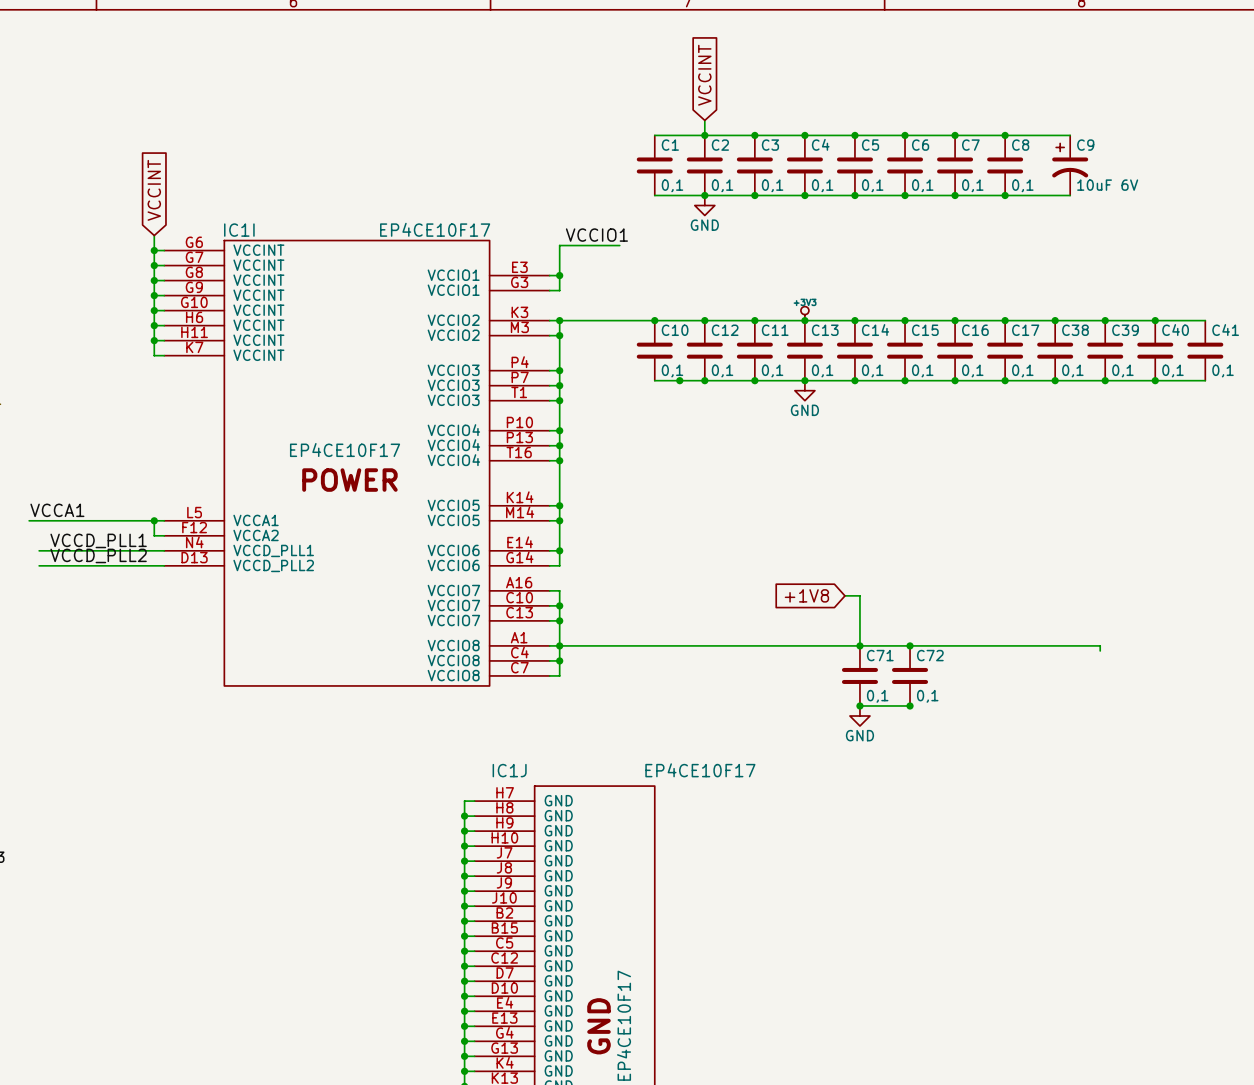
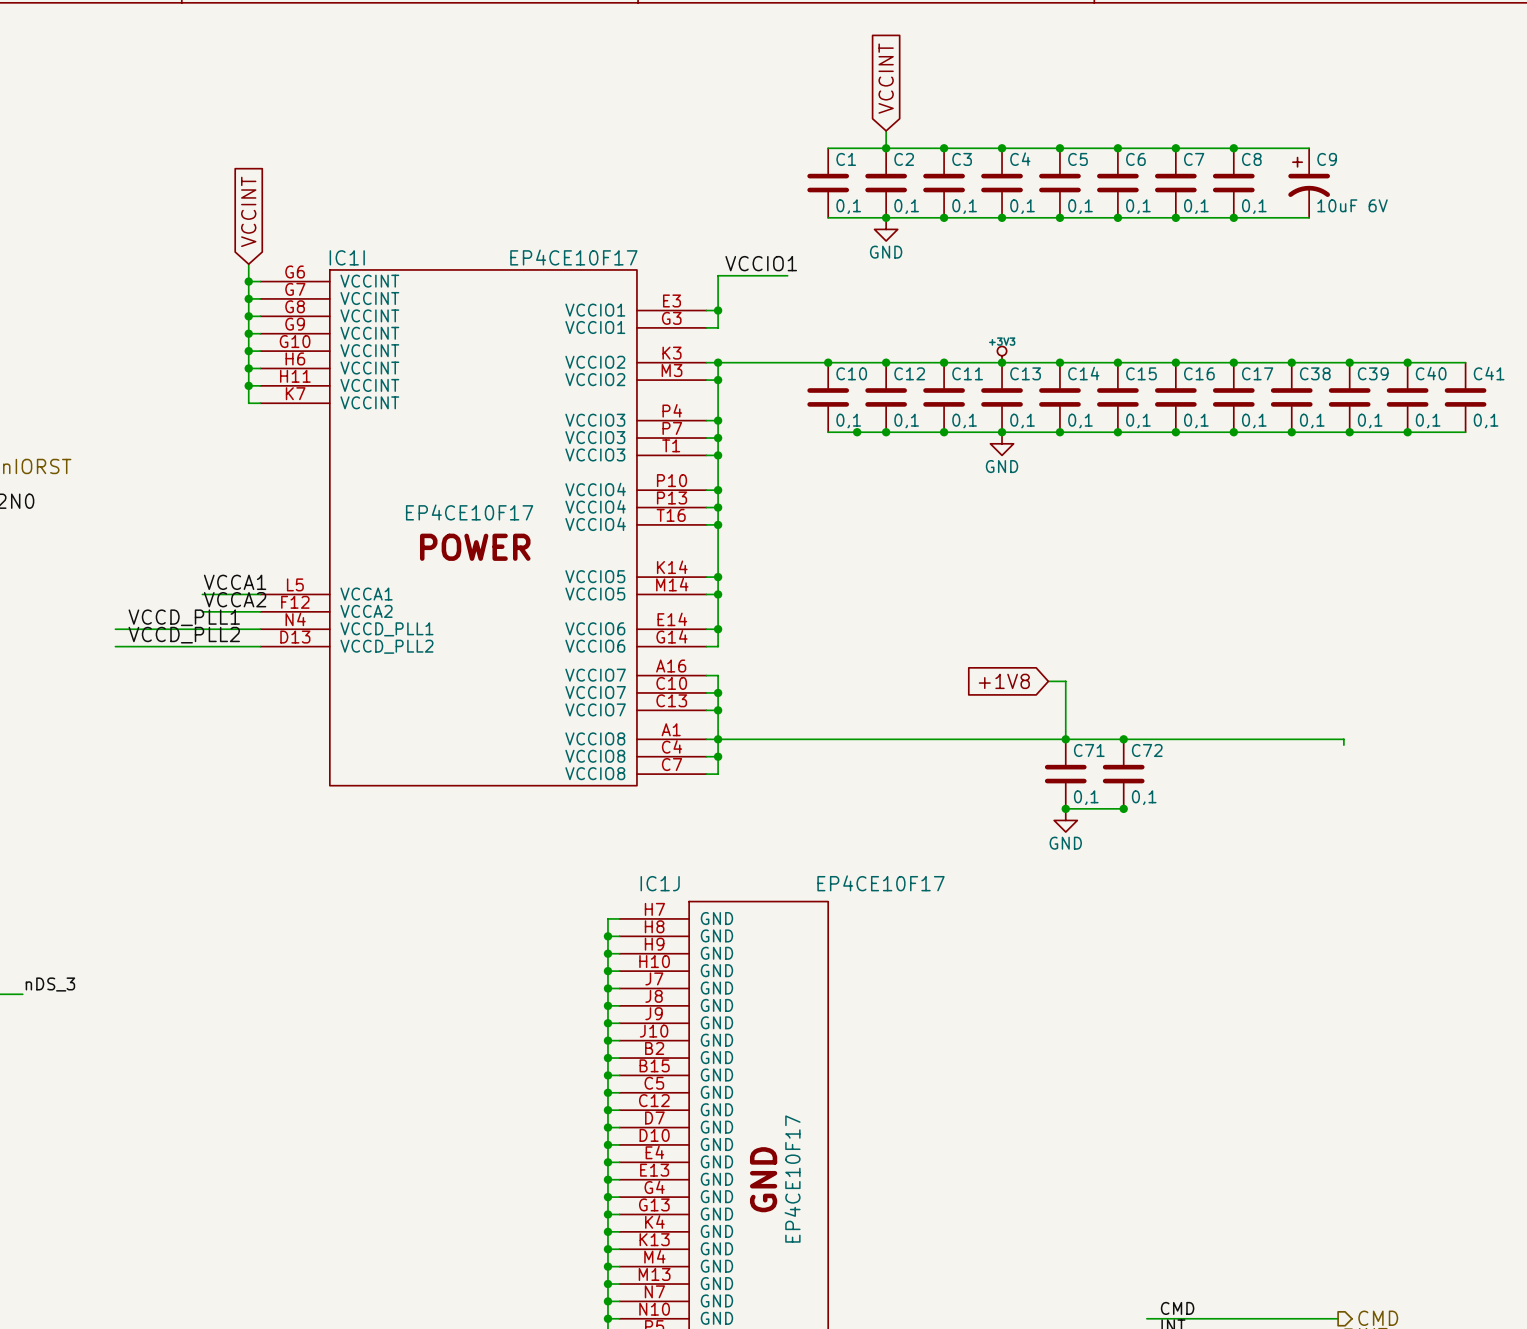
label position: VCCA1 (57, 510) -> VCCA1 (235, 582)
wire: (29, 520) (114, 520) -> none
wire: (154, 520) (154, 535) -> (202, 611) (248, 611)
junction: (154, 520) -> none
label: none -> VCCA2 (235, 599)

